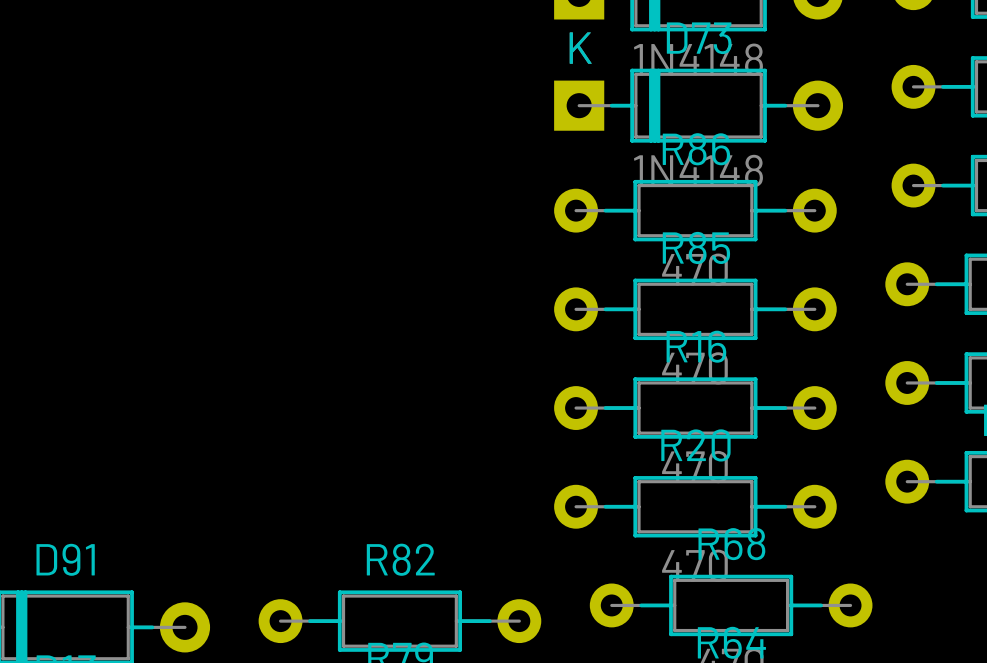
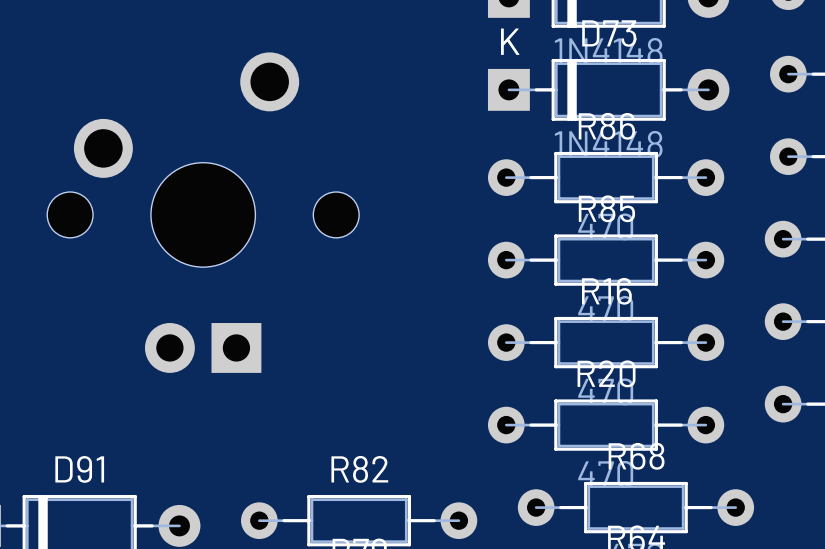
part: none -> (203, 212)

